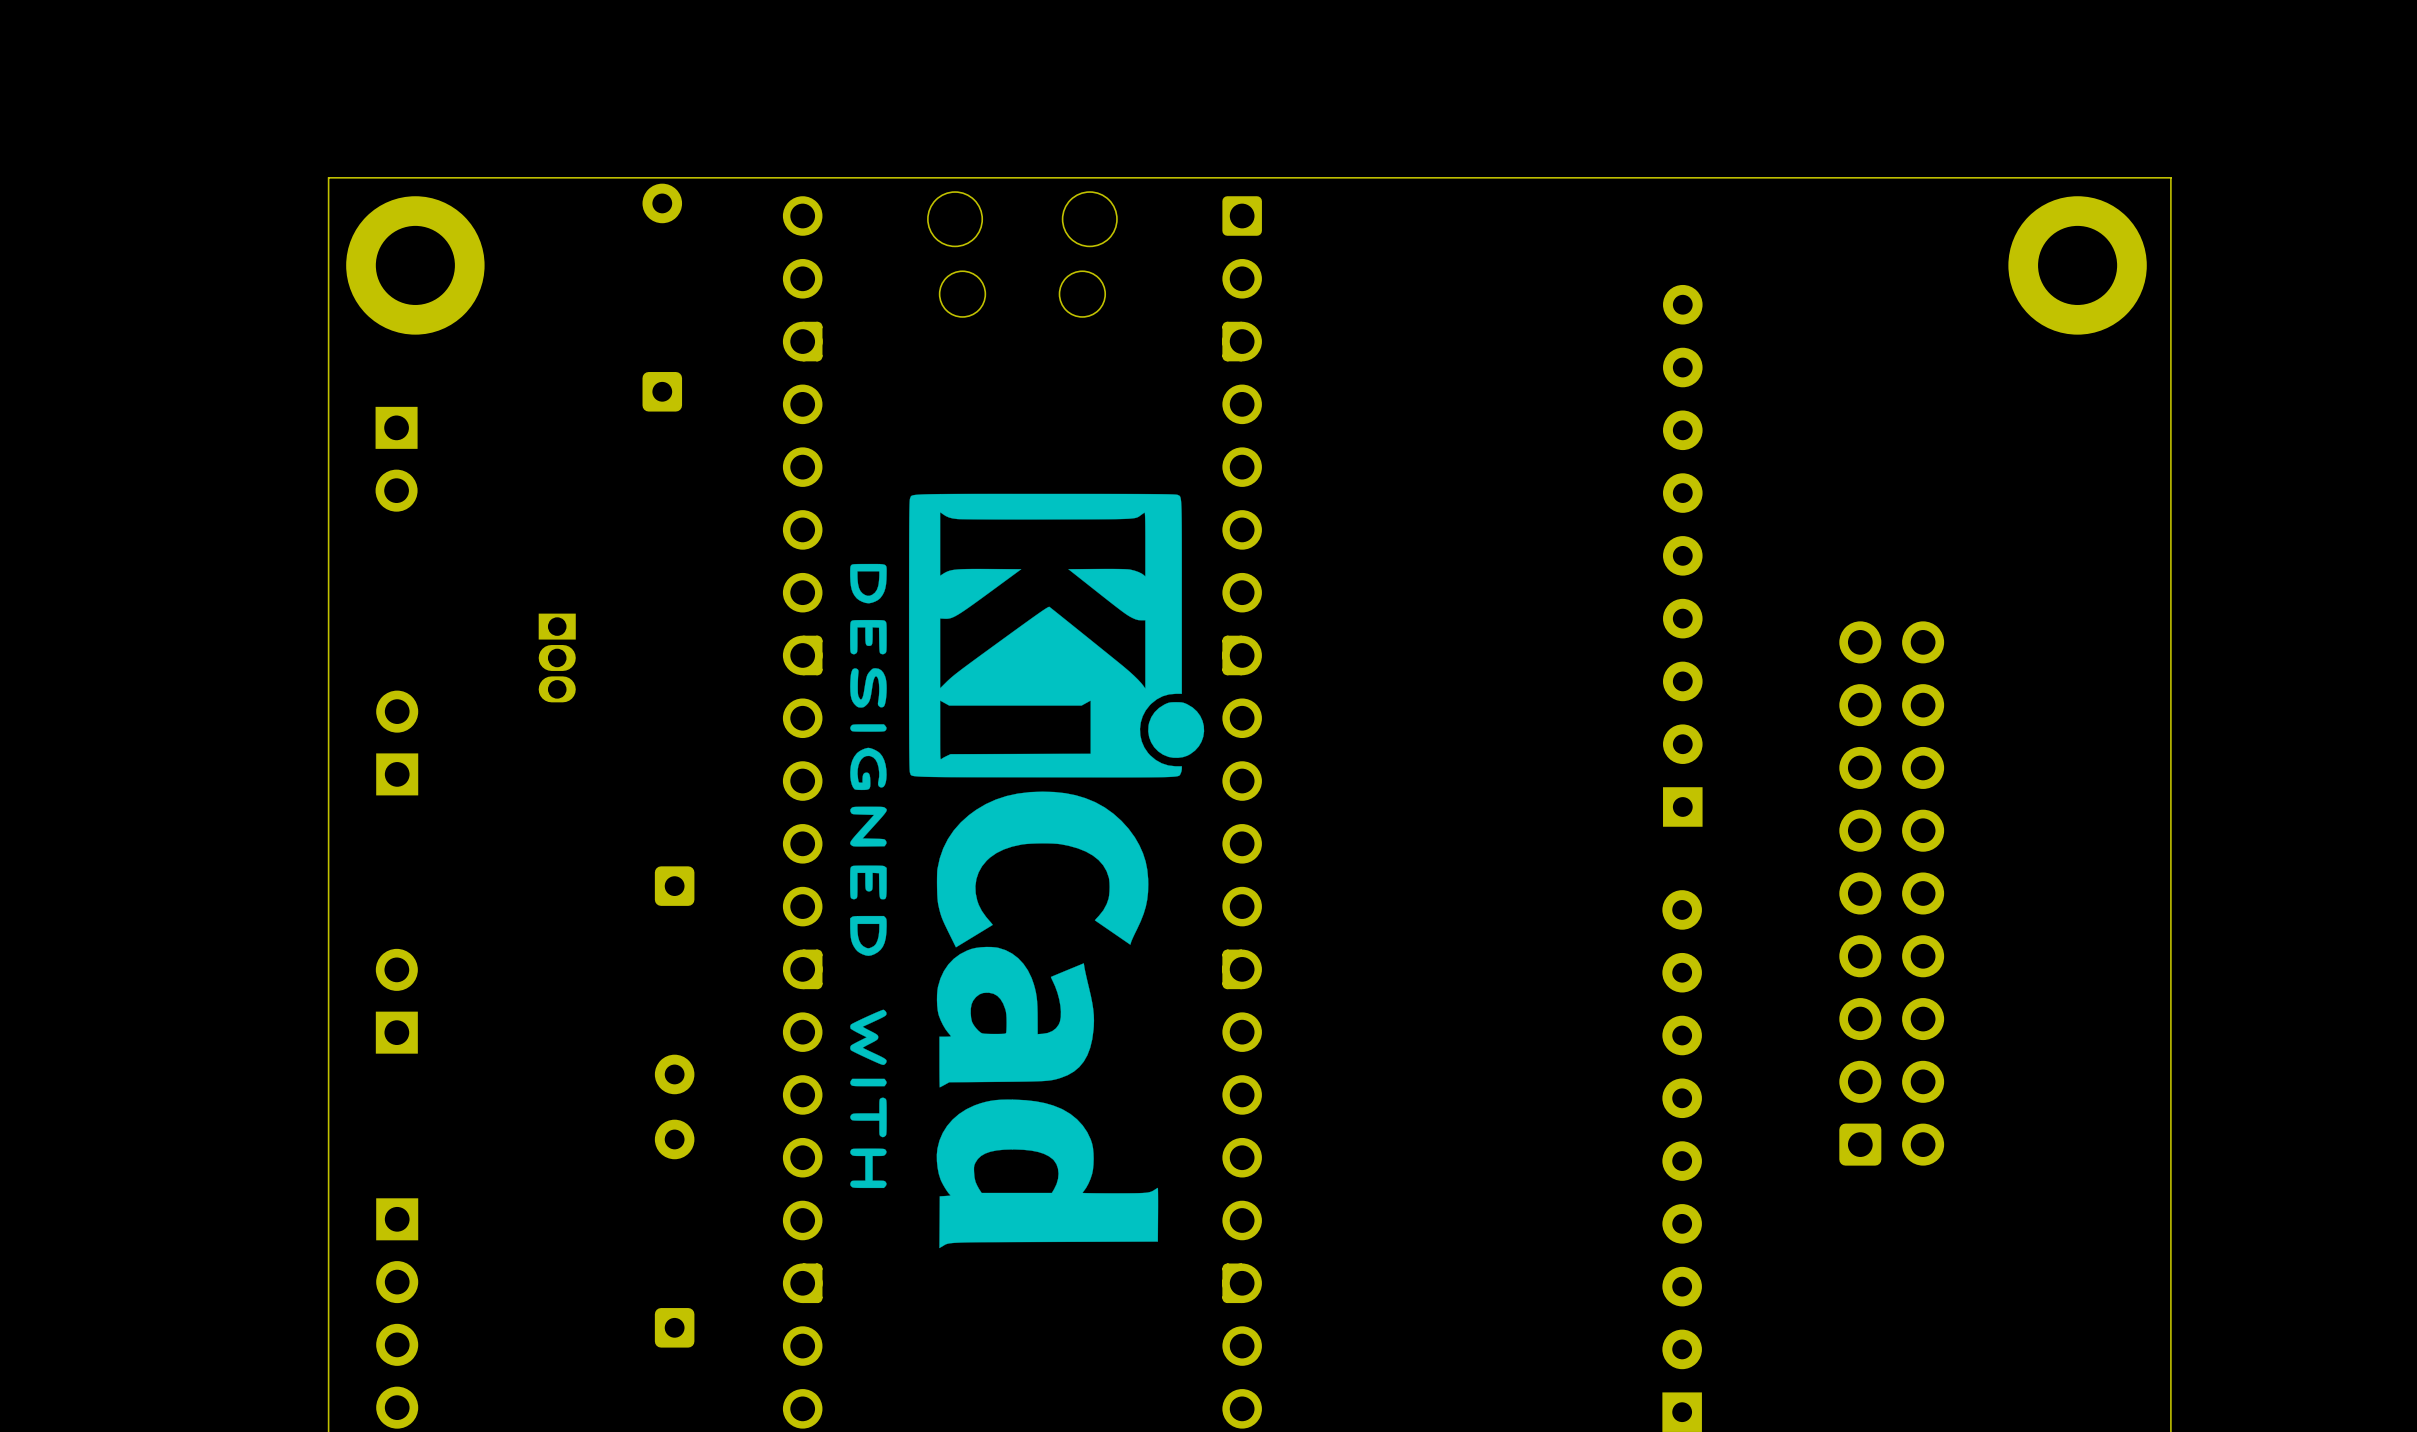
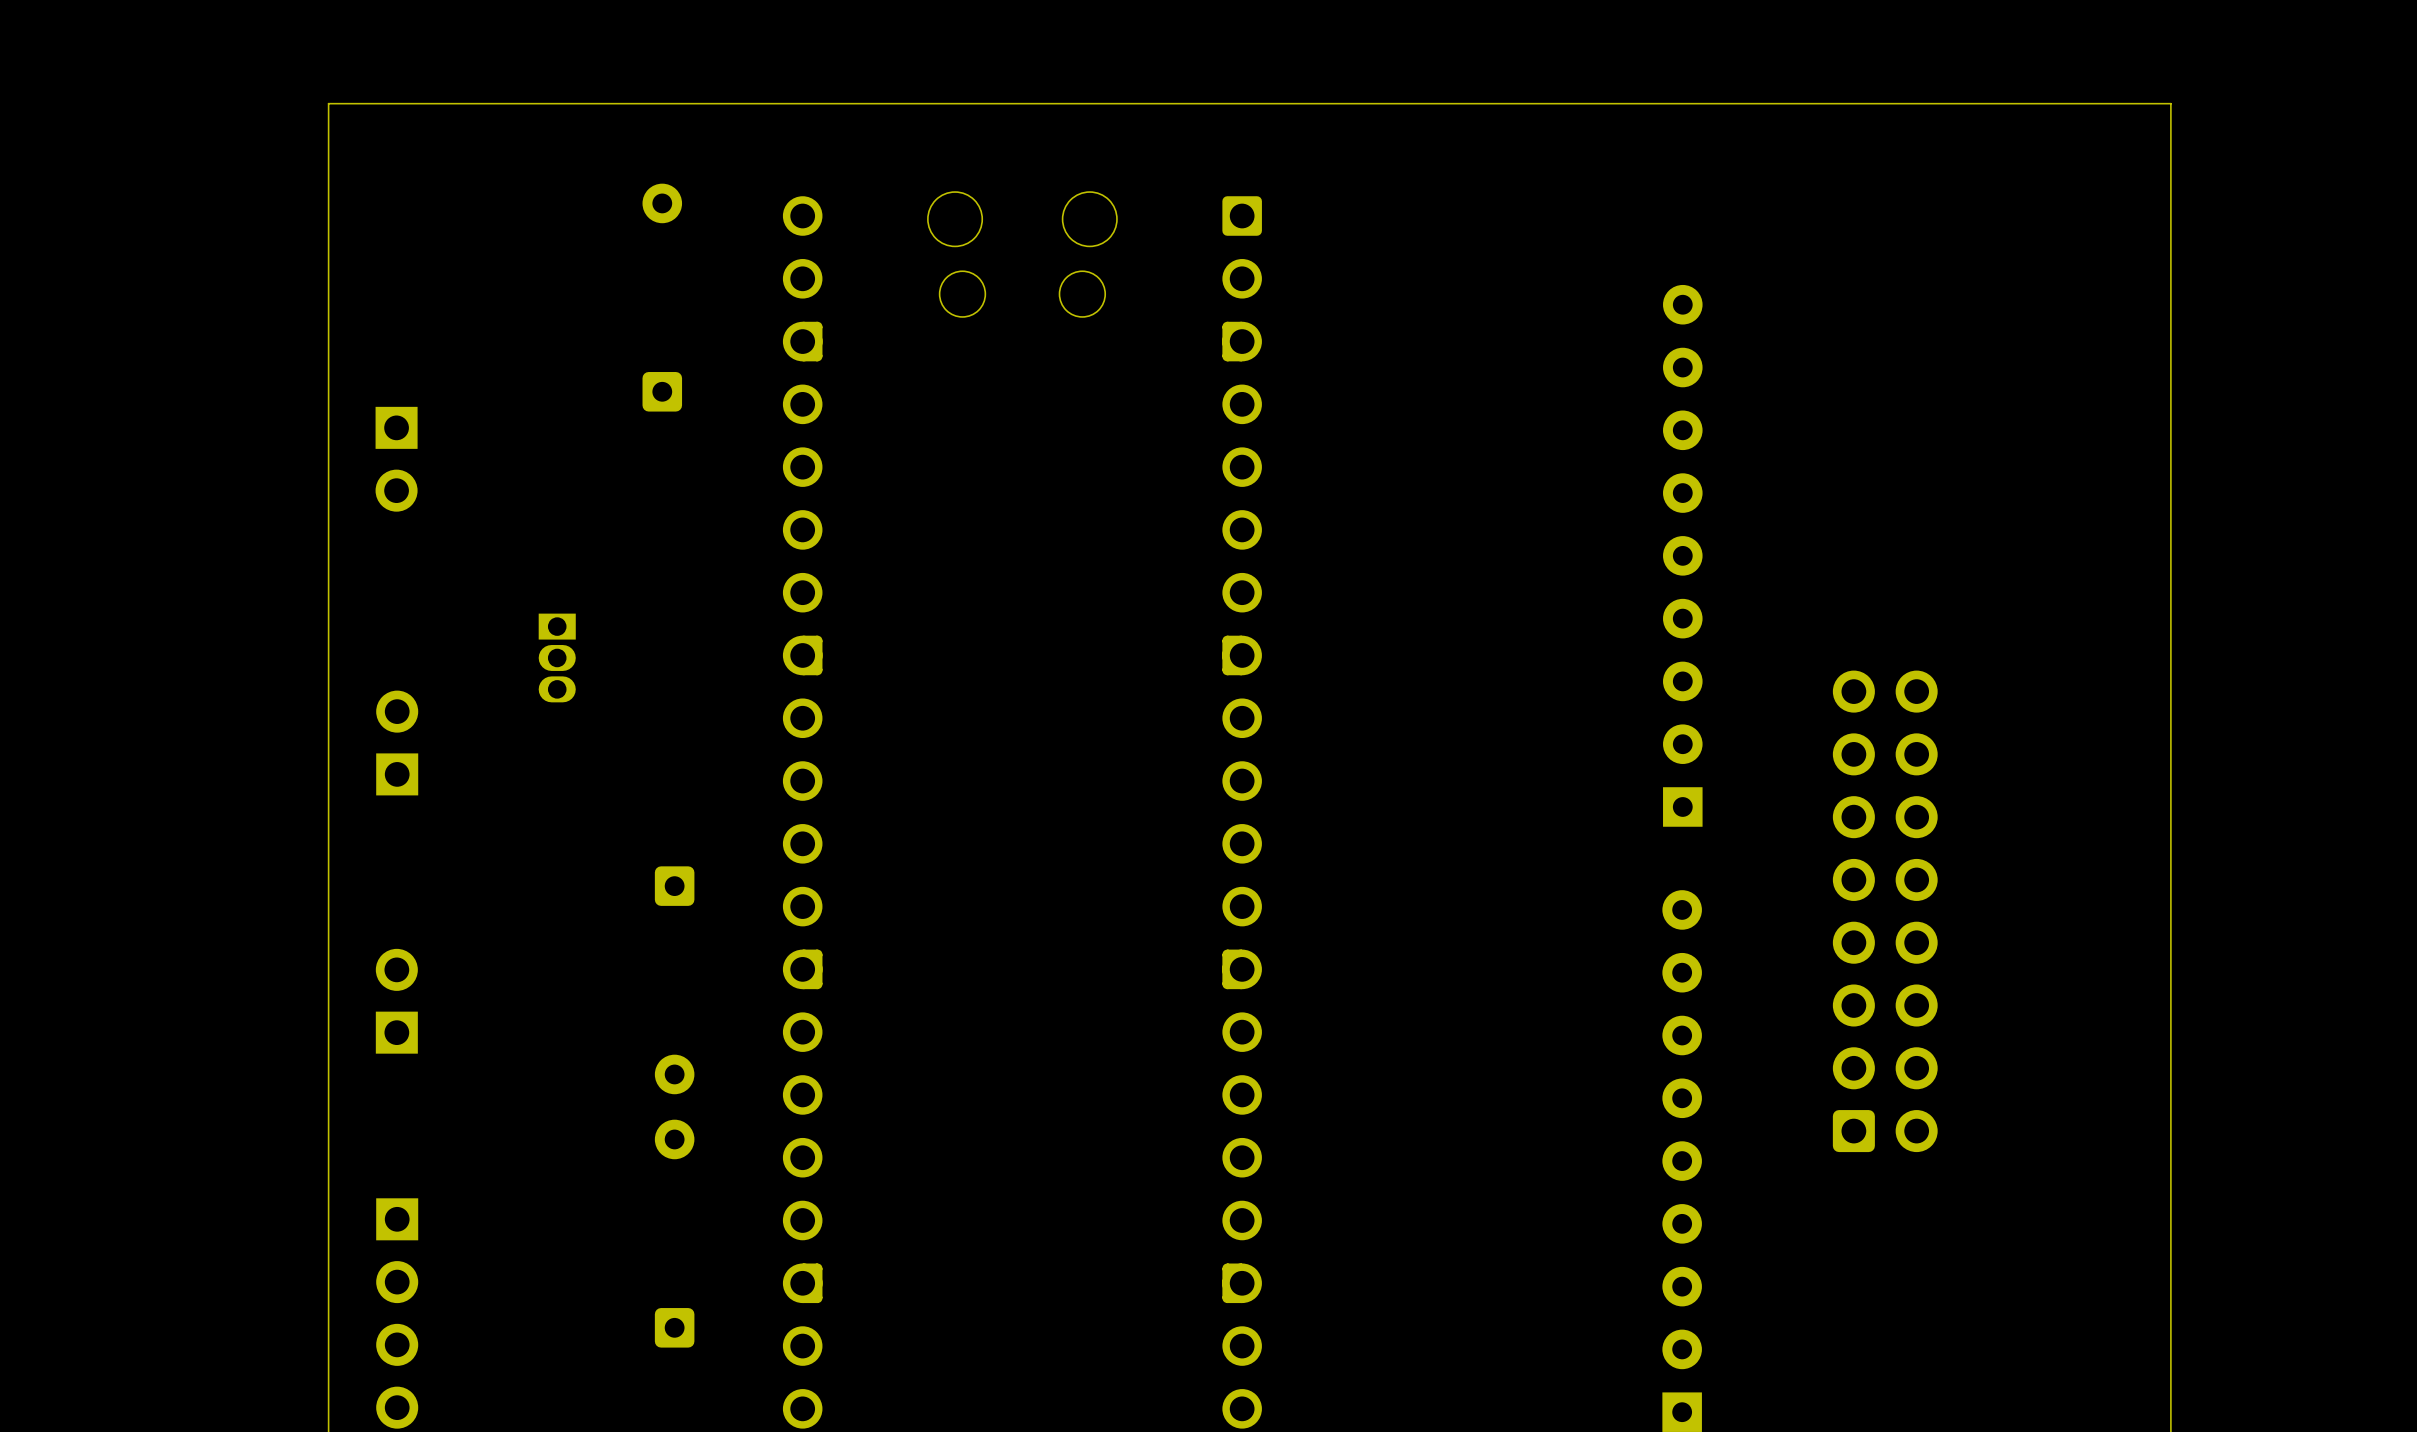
board edge: (2170, 177) (328, 177) -> (2170, 177) (2170, 103) (328, 103) (328, 177)
part: (415, 265) -> none
part: (2077, 265) -> none
drawing: [850, 493, 1205, 1249] -> none
part footprint: [1839, 621, 1945, 1166] -> [1832, 670, 1938, 1153]

